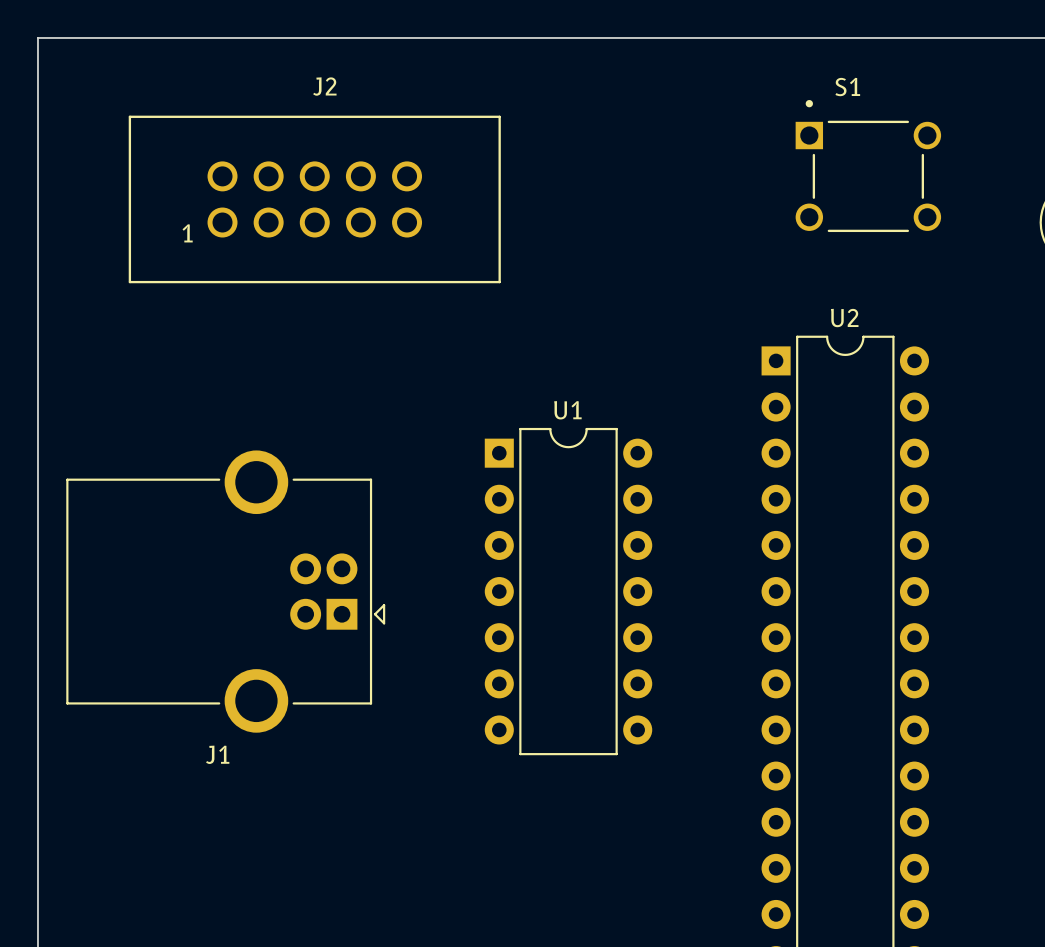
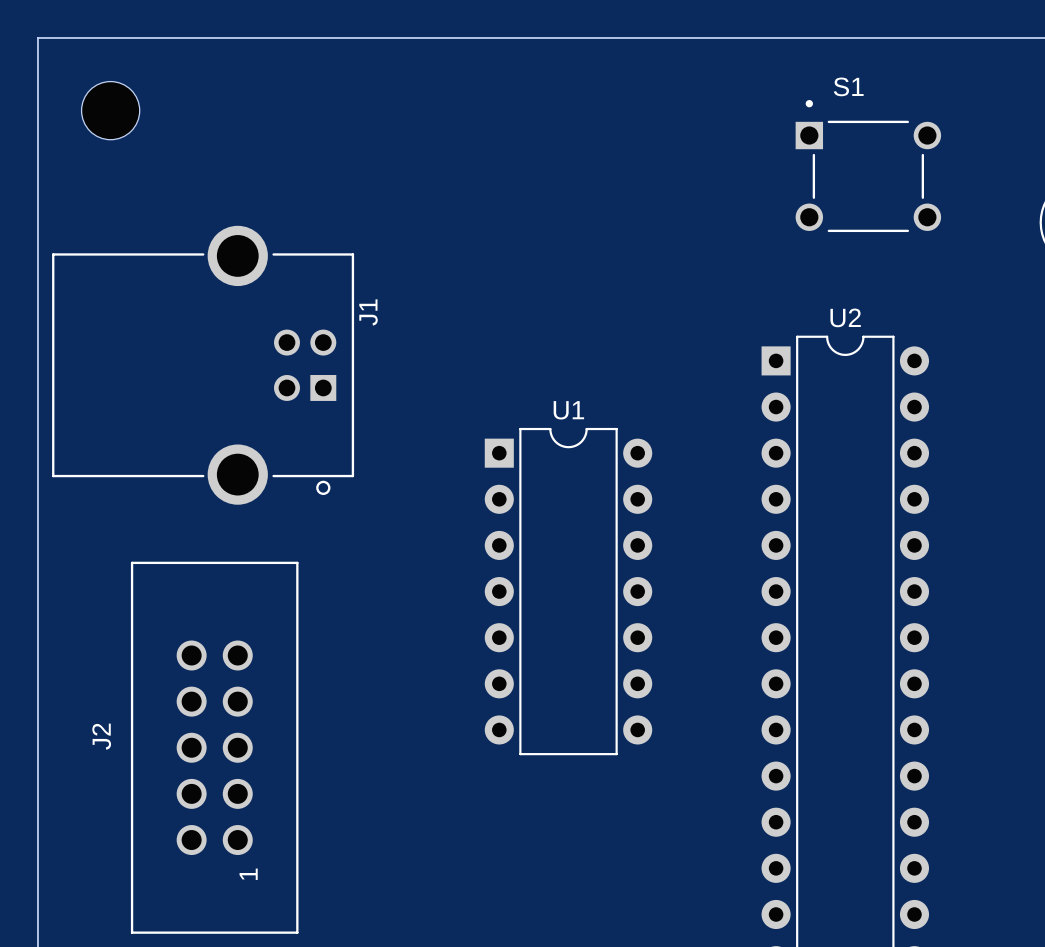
part: none -> (110, 110)
J2 rotation: 0° (314, 199) -> 90° counterclockwise (214, 747)
J2 position: (314, 199) -> (214, 747)
J1 footprint: [66, 450, 386, 733] -> [52, 225, 355, 505]
J1 name position: J1 (217, 754) -> J1 (368, 312)

